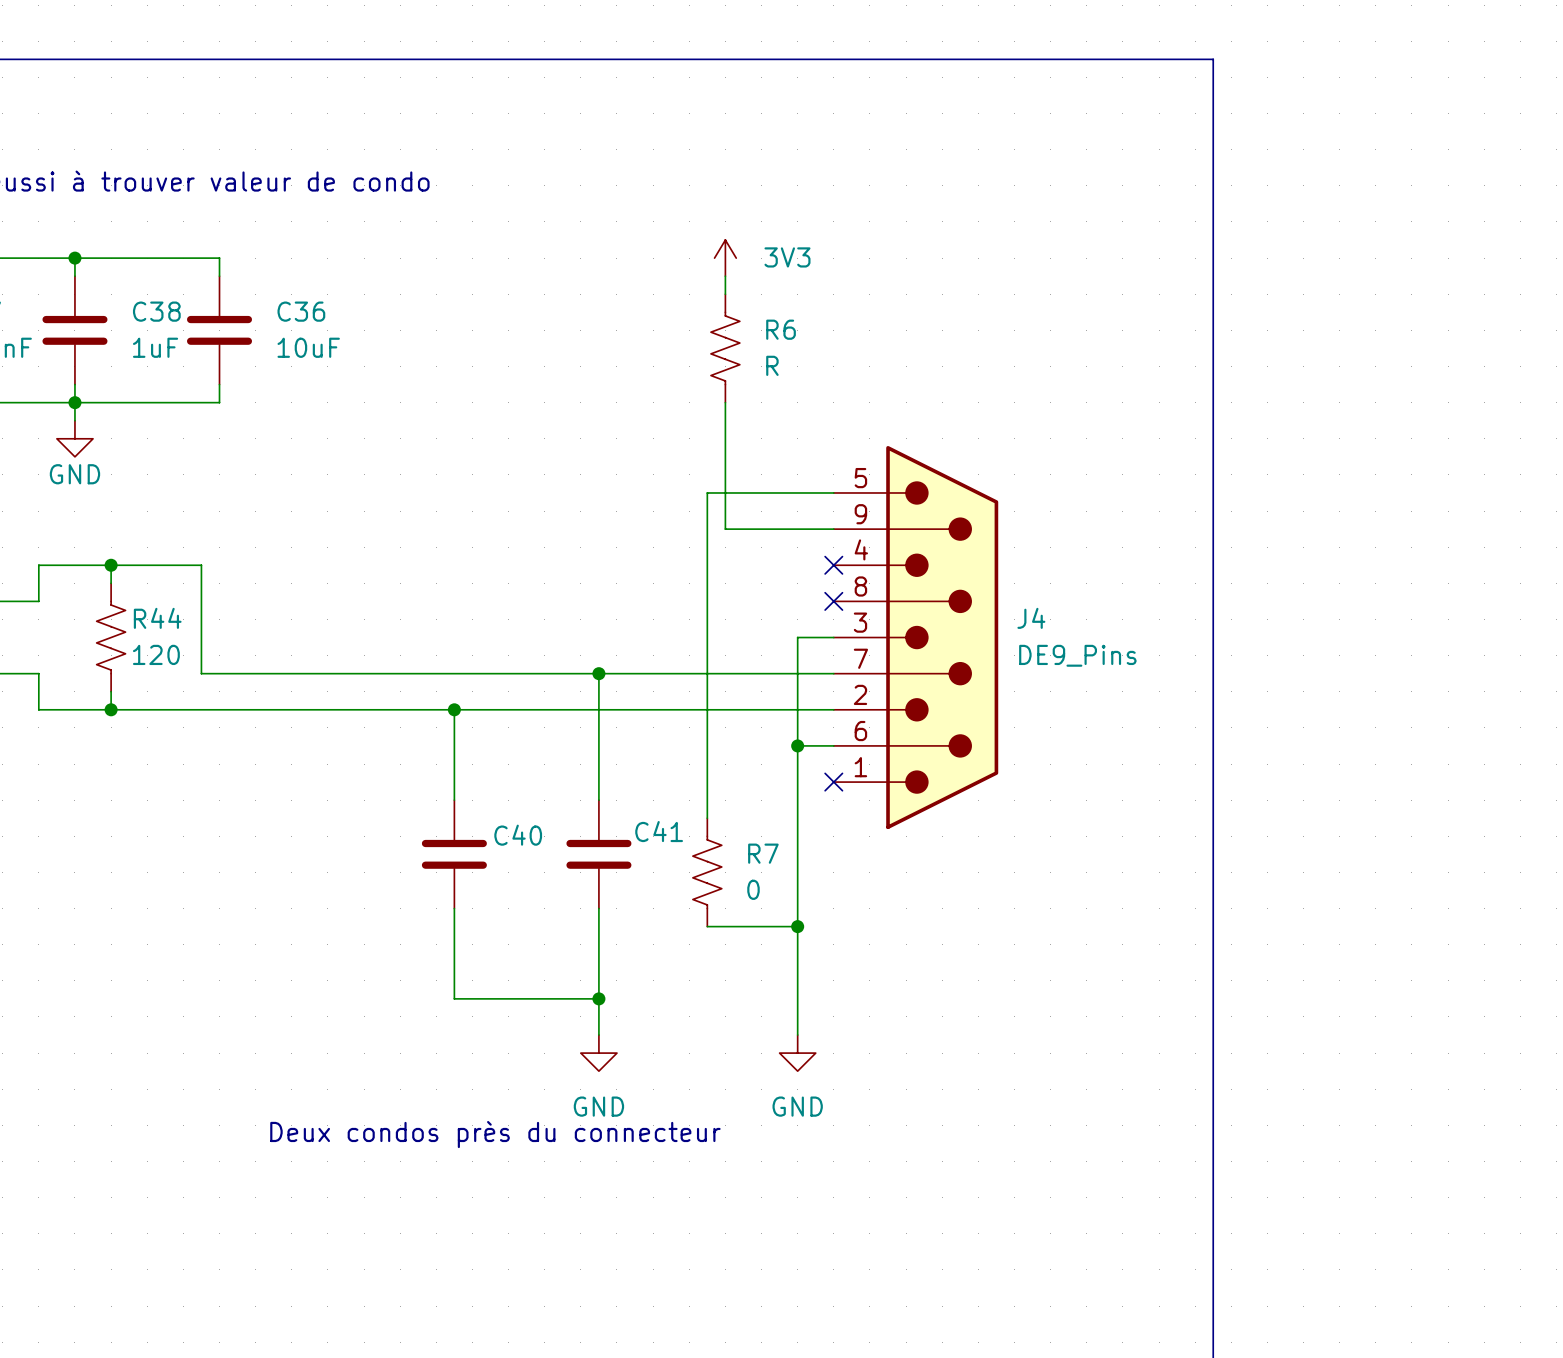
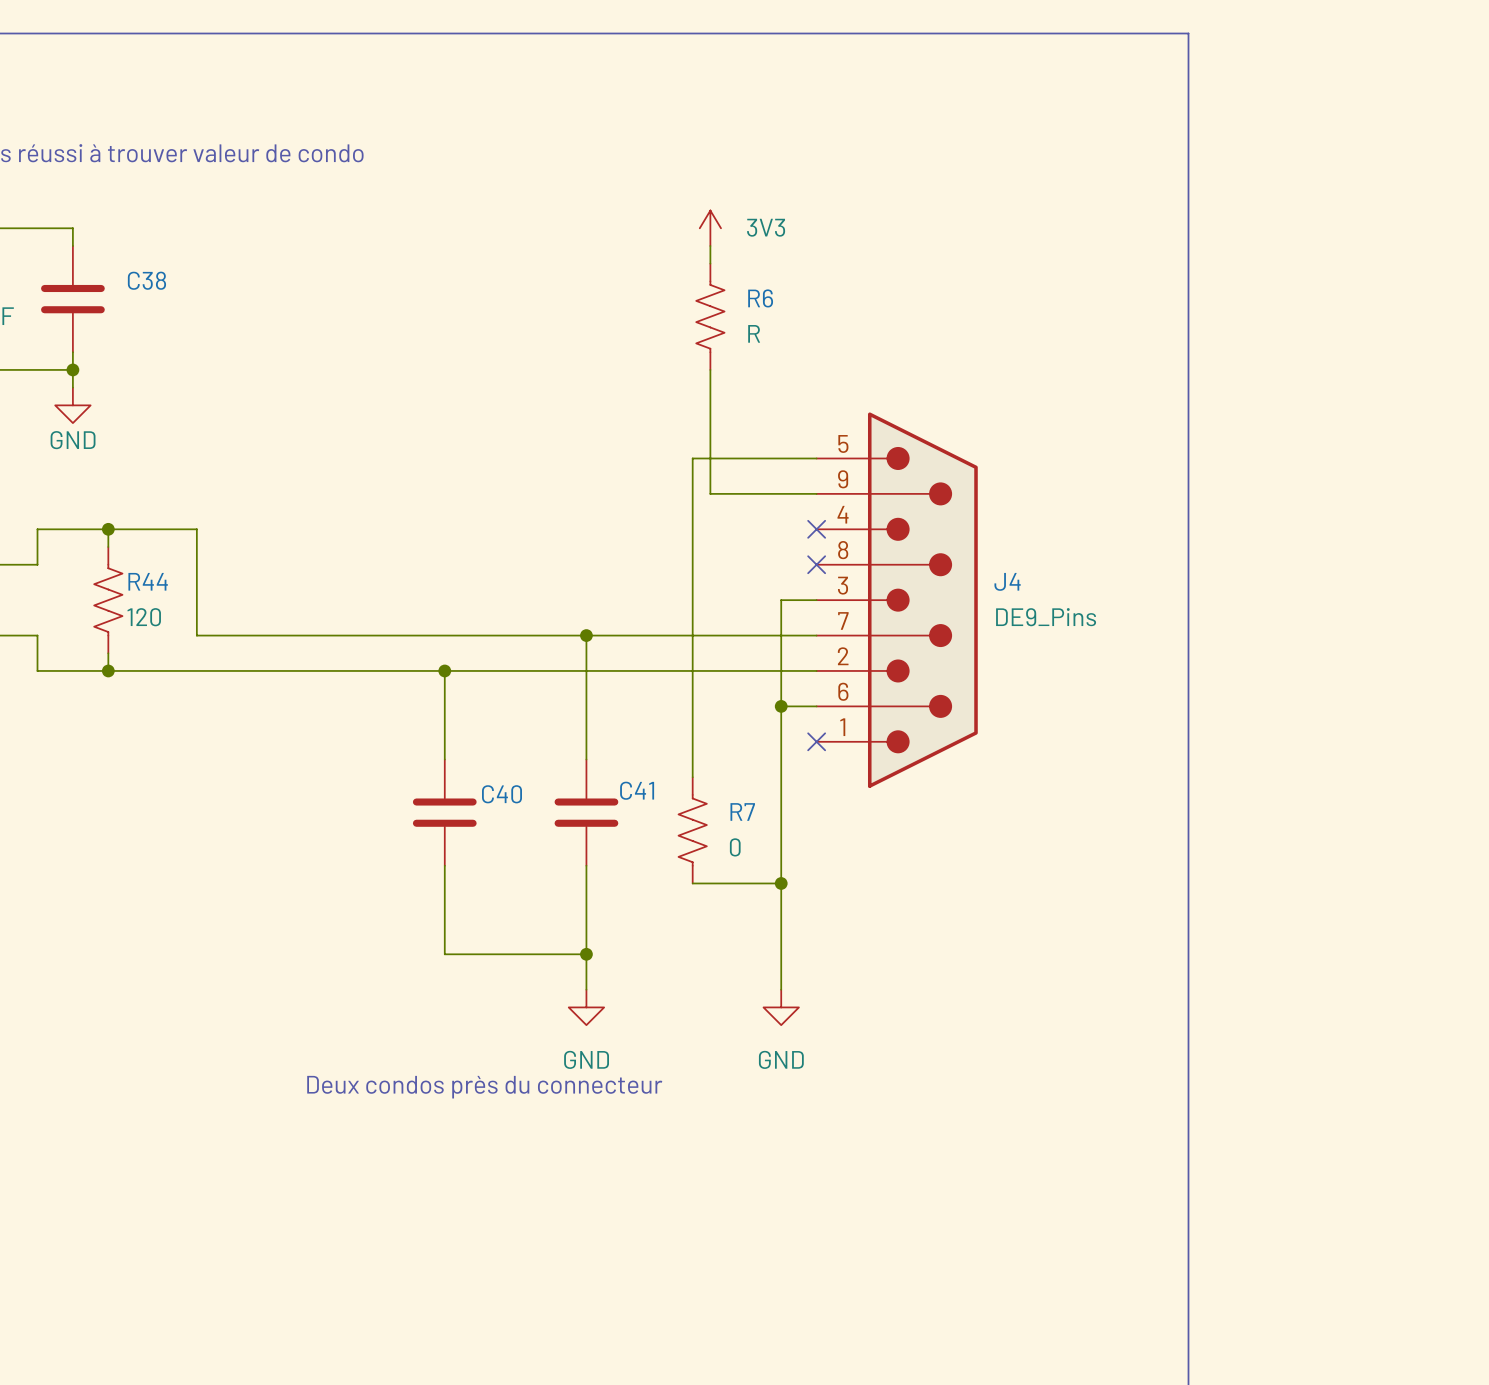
wire: (74, 258) (219, 258) (219, 276) -> none
junction: (74, 258) -> none
C36: 10uF (219, 330) -> none
C38 value: 1uF (155, 347) -> none
wire: (219, 384) (219, 402) (74, 402) -> none

